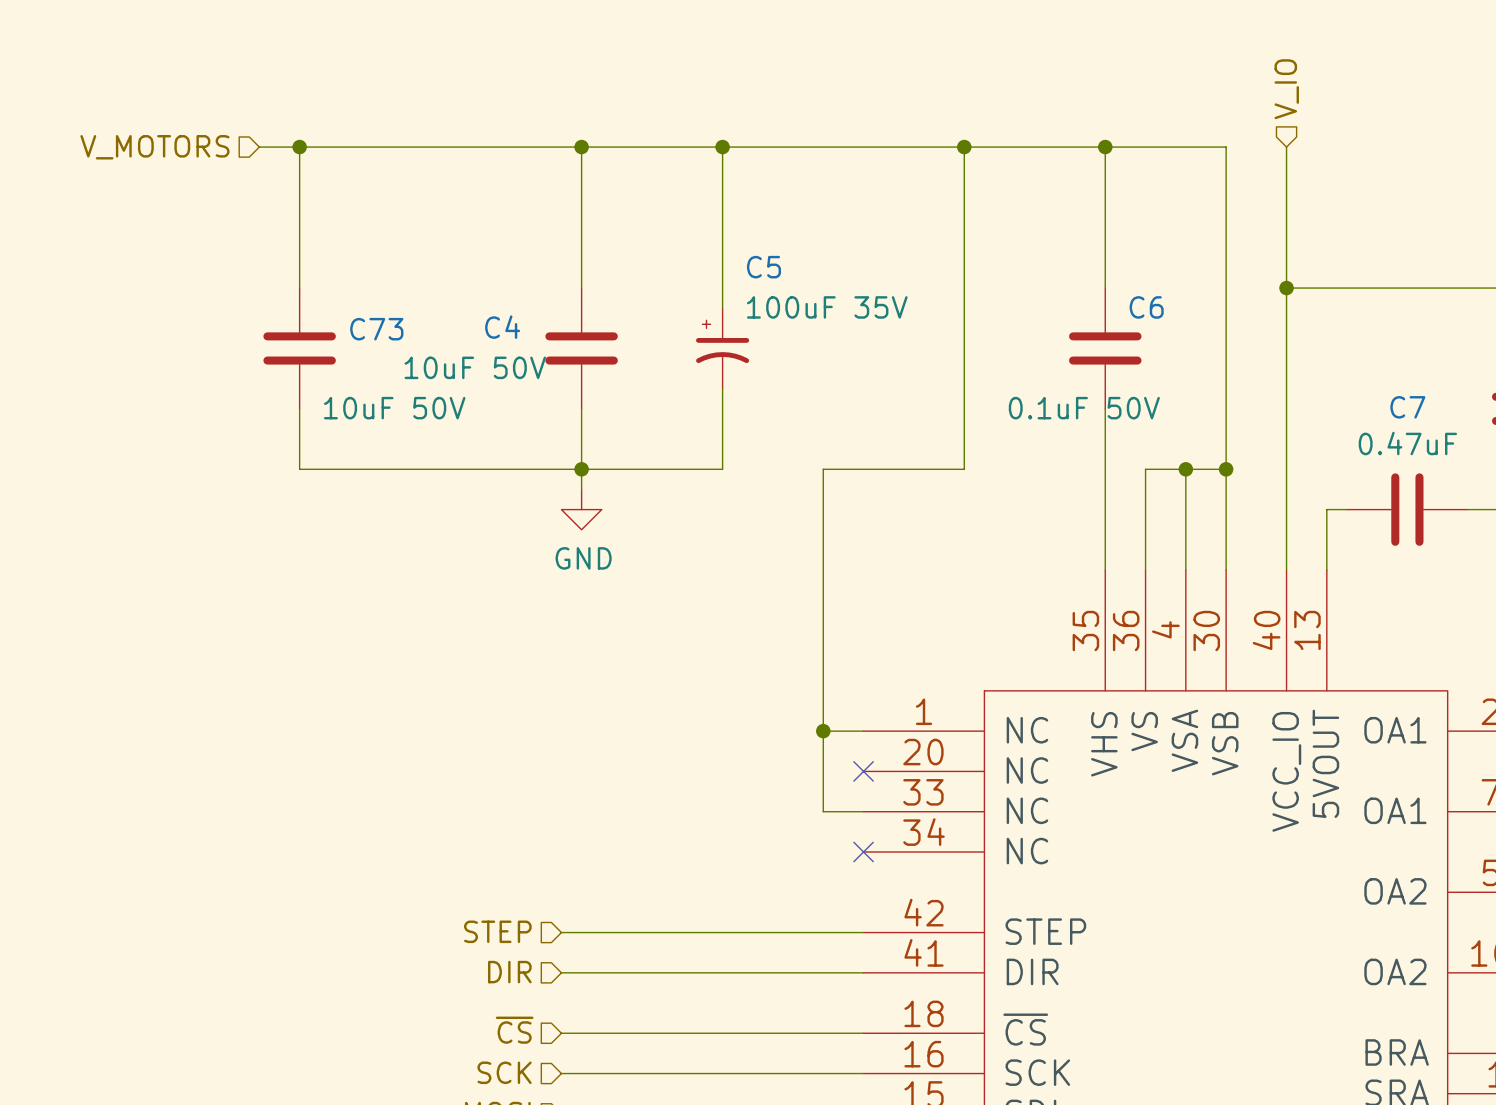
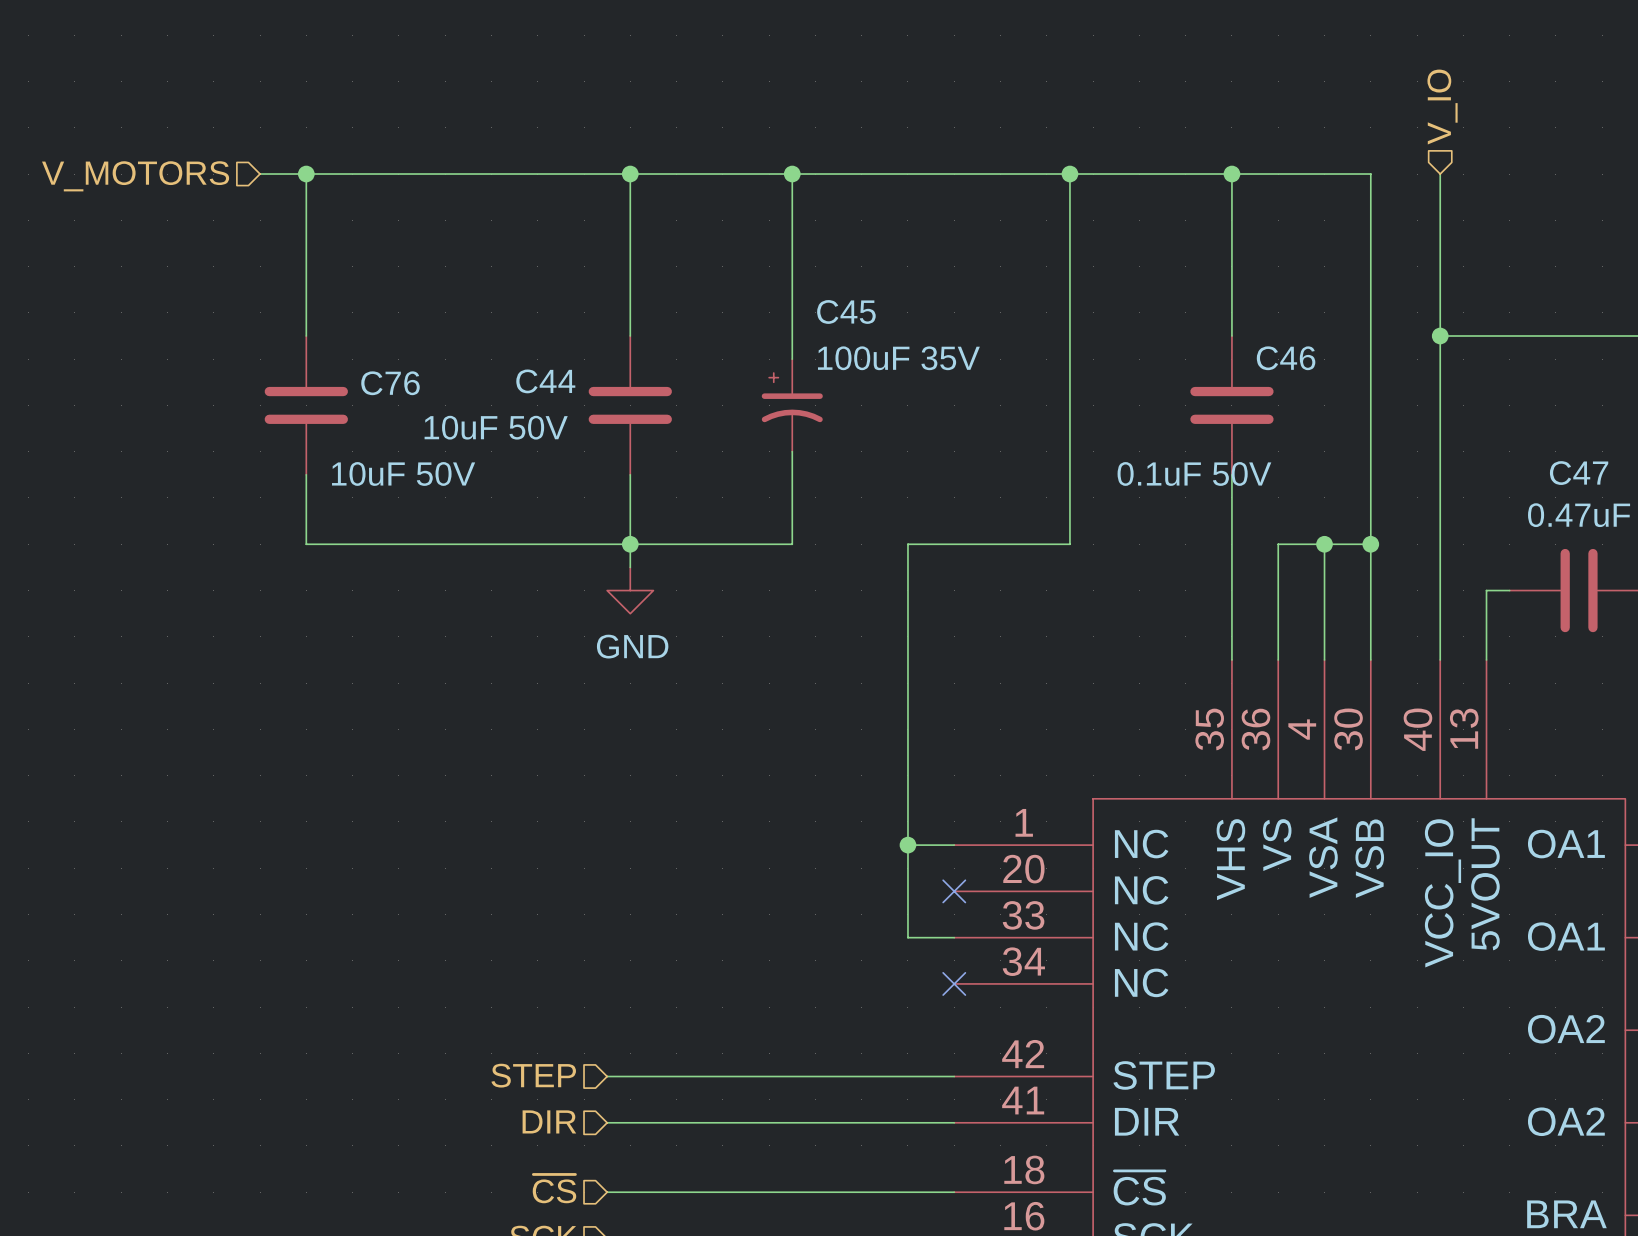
C5 name: C5 (763, 267) -> C45 (846, 311)
C6 name: C6 (1146, 307) -> C46 (1286, 358)
C4 name: C4 (502, 327) -> C44 (545, 381)
C73 name: C73 (376, 329) -> C76 (390, 383)
C7 name: C7 (1407, 407) -> C47 (1579, 473)

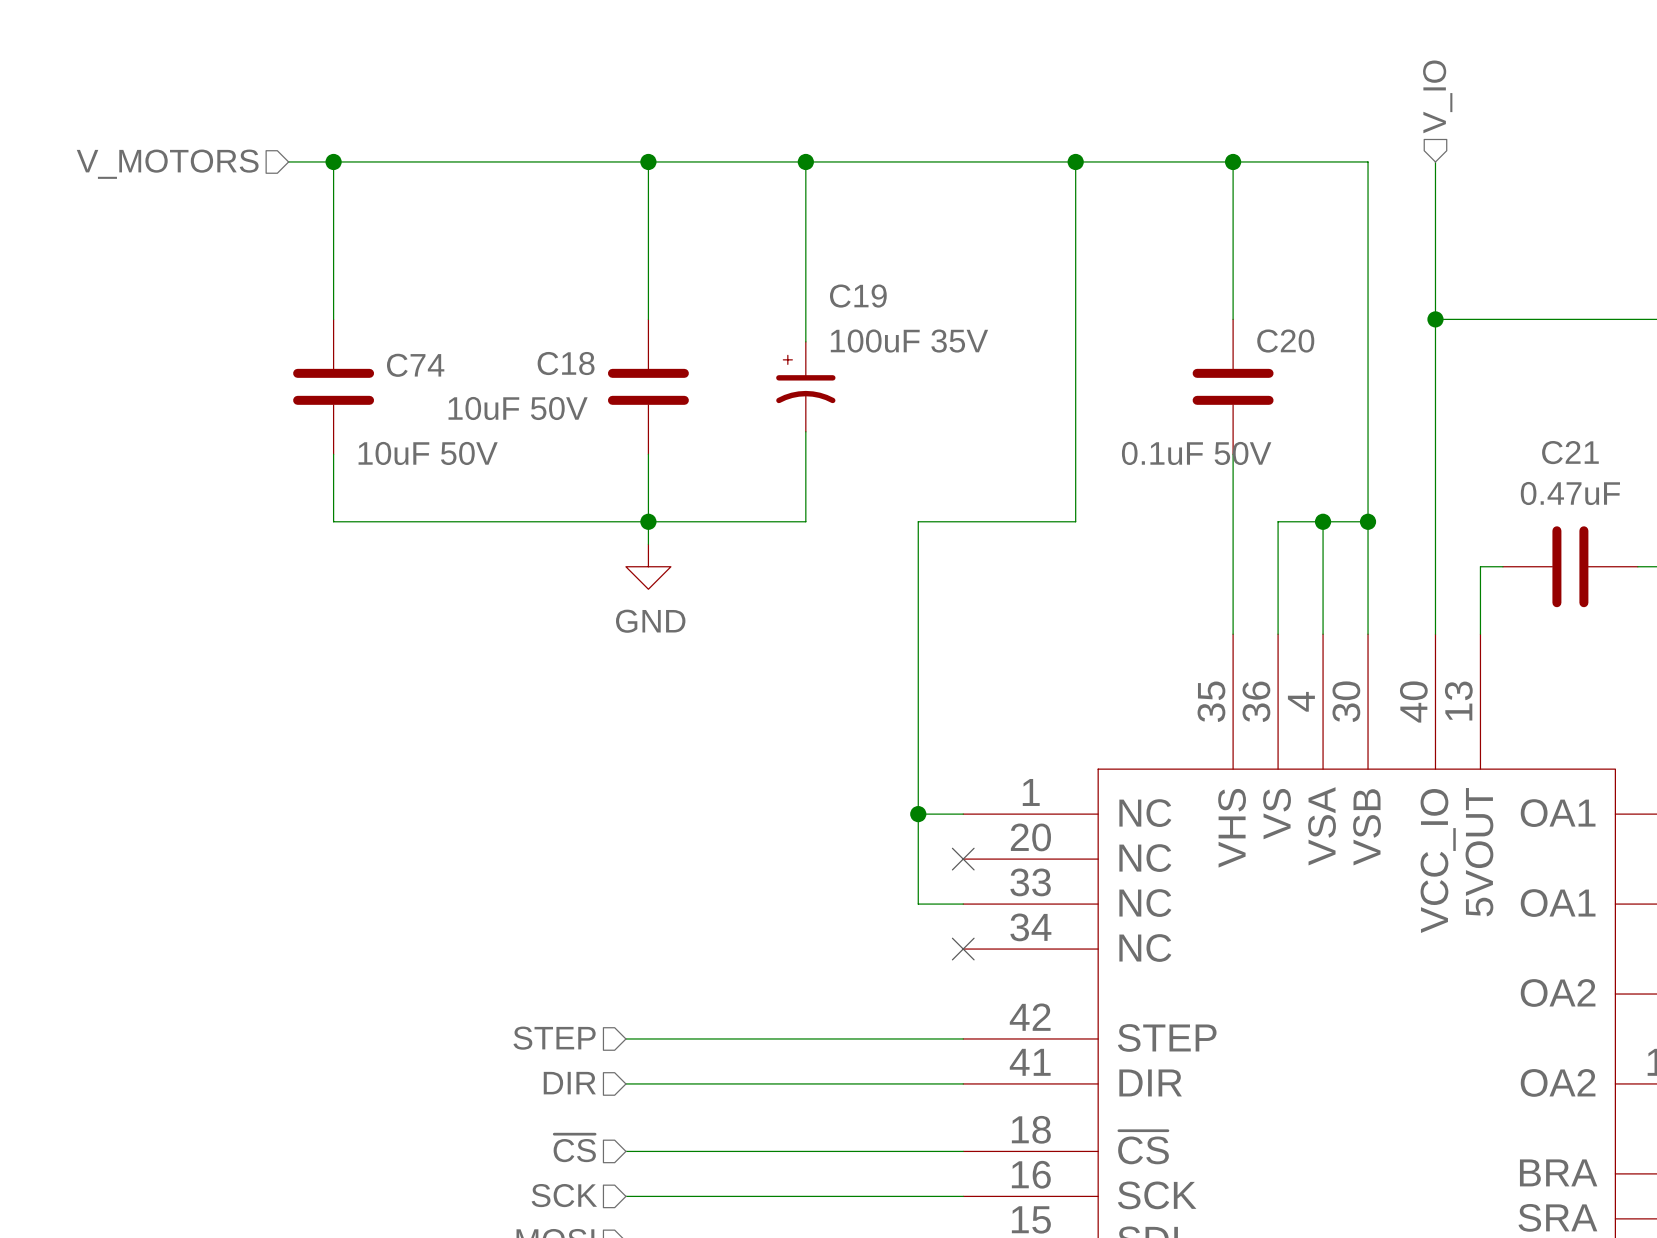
C45 name: C45 (846, 311) -> C19 (858, 296)
C46 name: C46 (1286, 358) -> C20 (1285, 341)
C44 name: C44 (545, 381) -> C18 (566, 363)
C76 name: C76 (390, 383) -> C74 (415, 365)
C47 name: C47 (1579, 473) -> C21 (1570, 452)

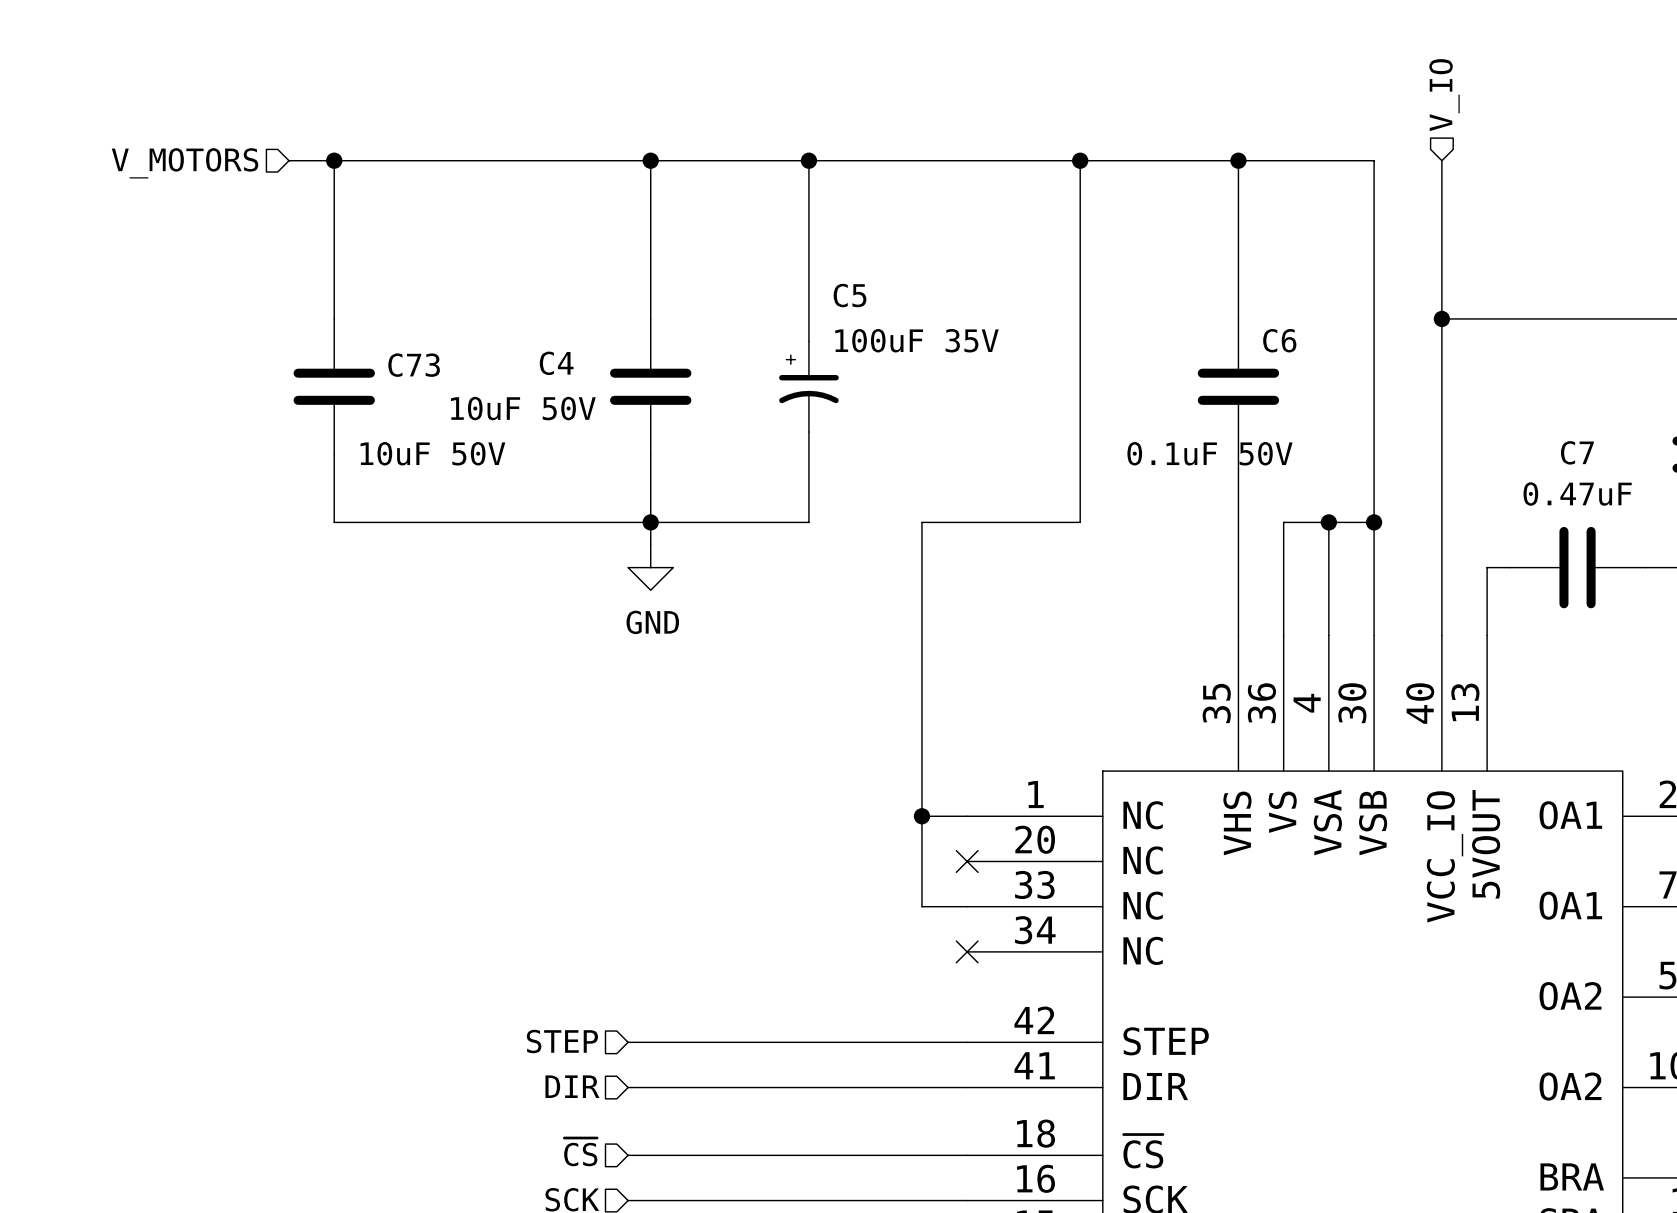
C19 name: C19 (858, 296) -> C5 (850, 295)
C20 name: C20 (1285, 341) -> C6 (1279, 340)
C18 name: C18 (566, 363) -> C4 (556, 363)
C74 name: C74 (415, 365) -> C73 (414, 365)
C21 name: C21 (1570, 452) -> C7 (1577, 452)

